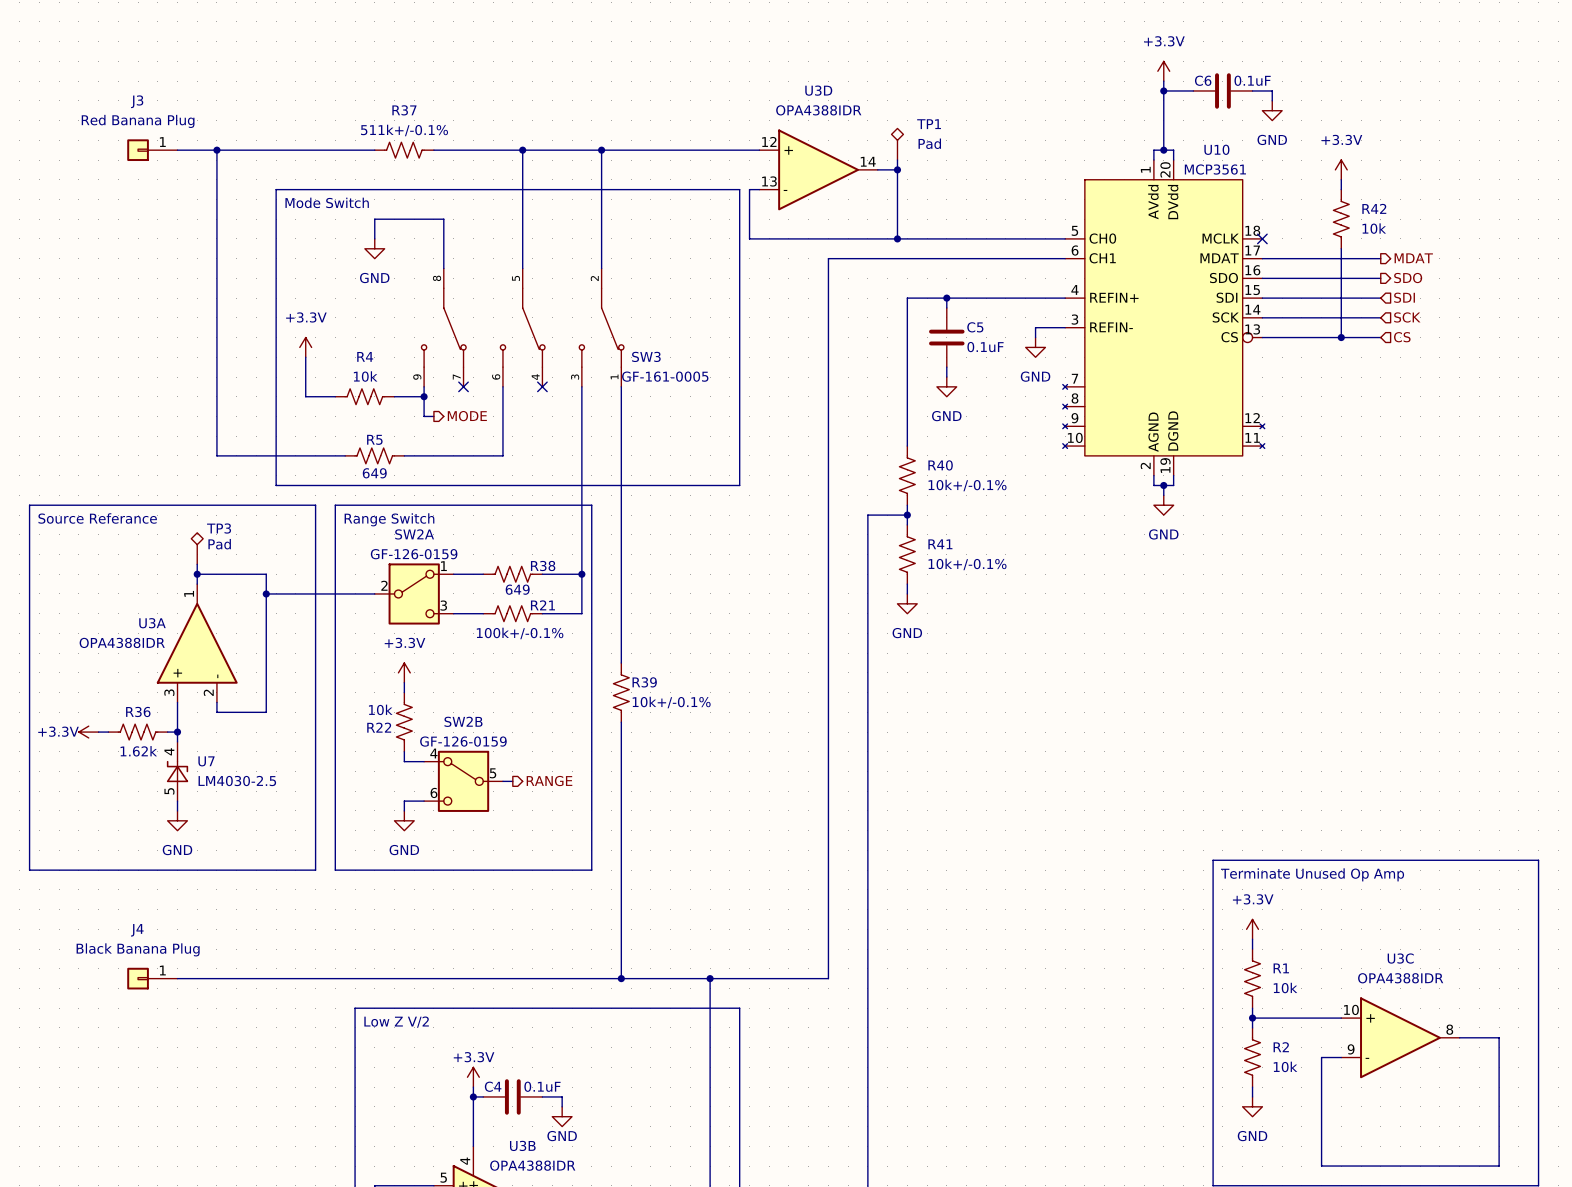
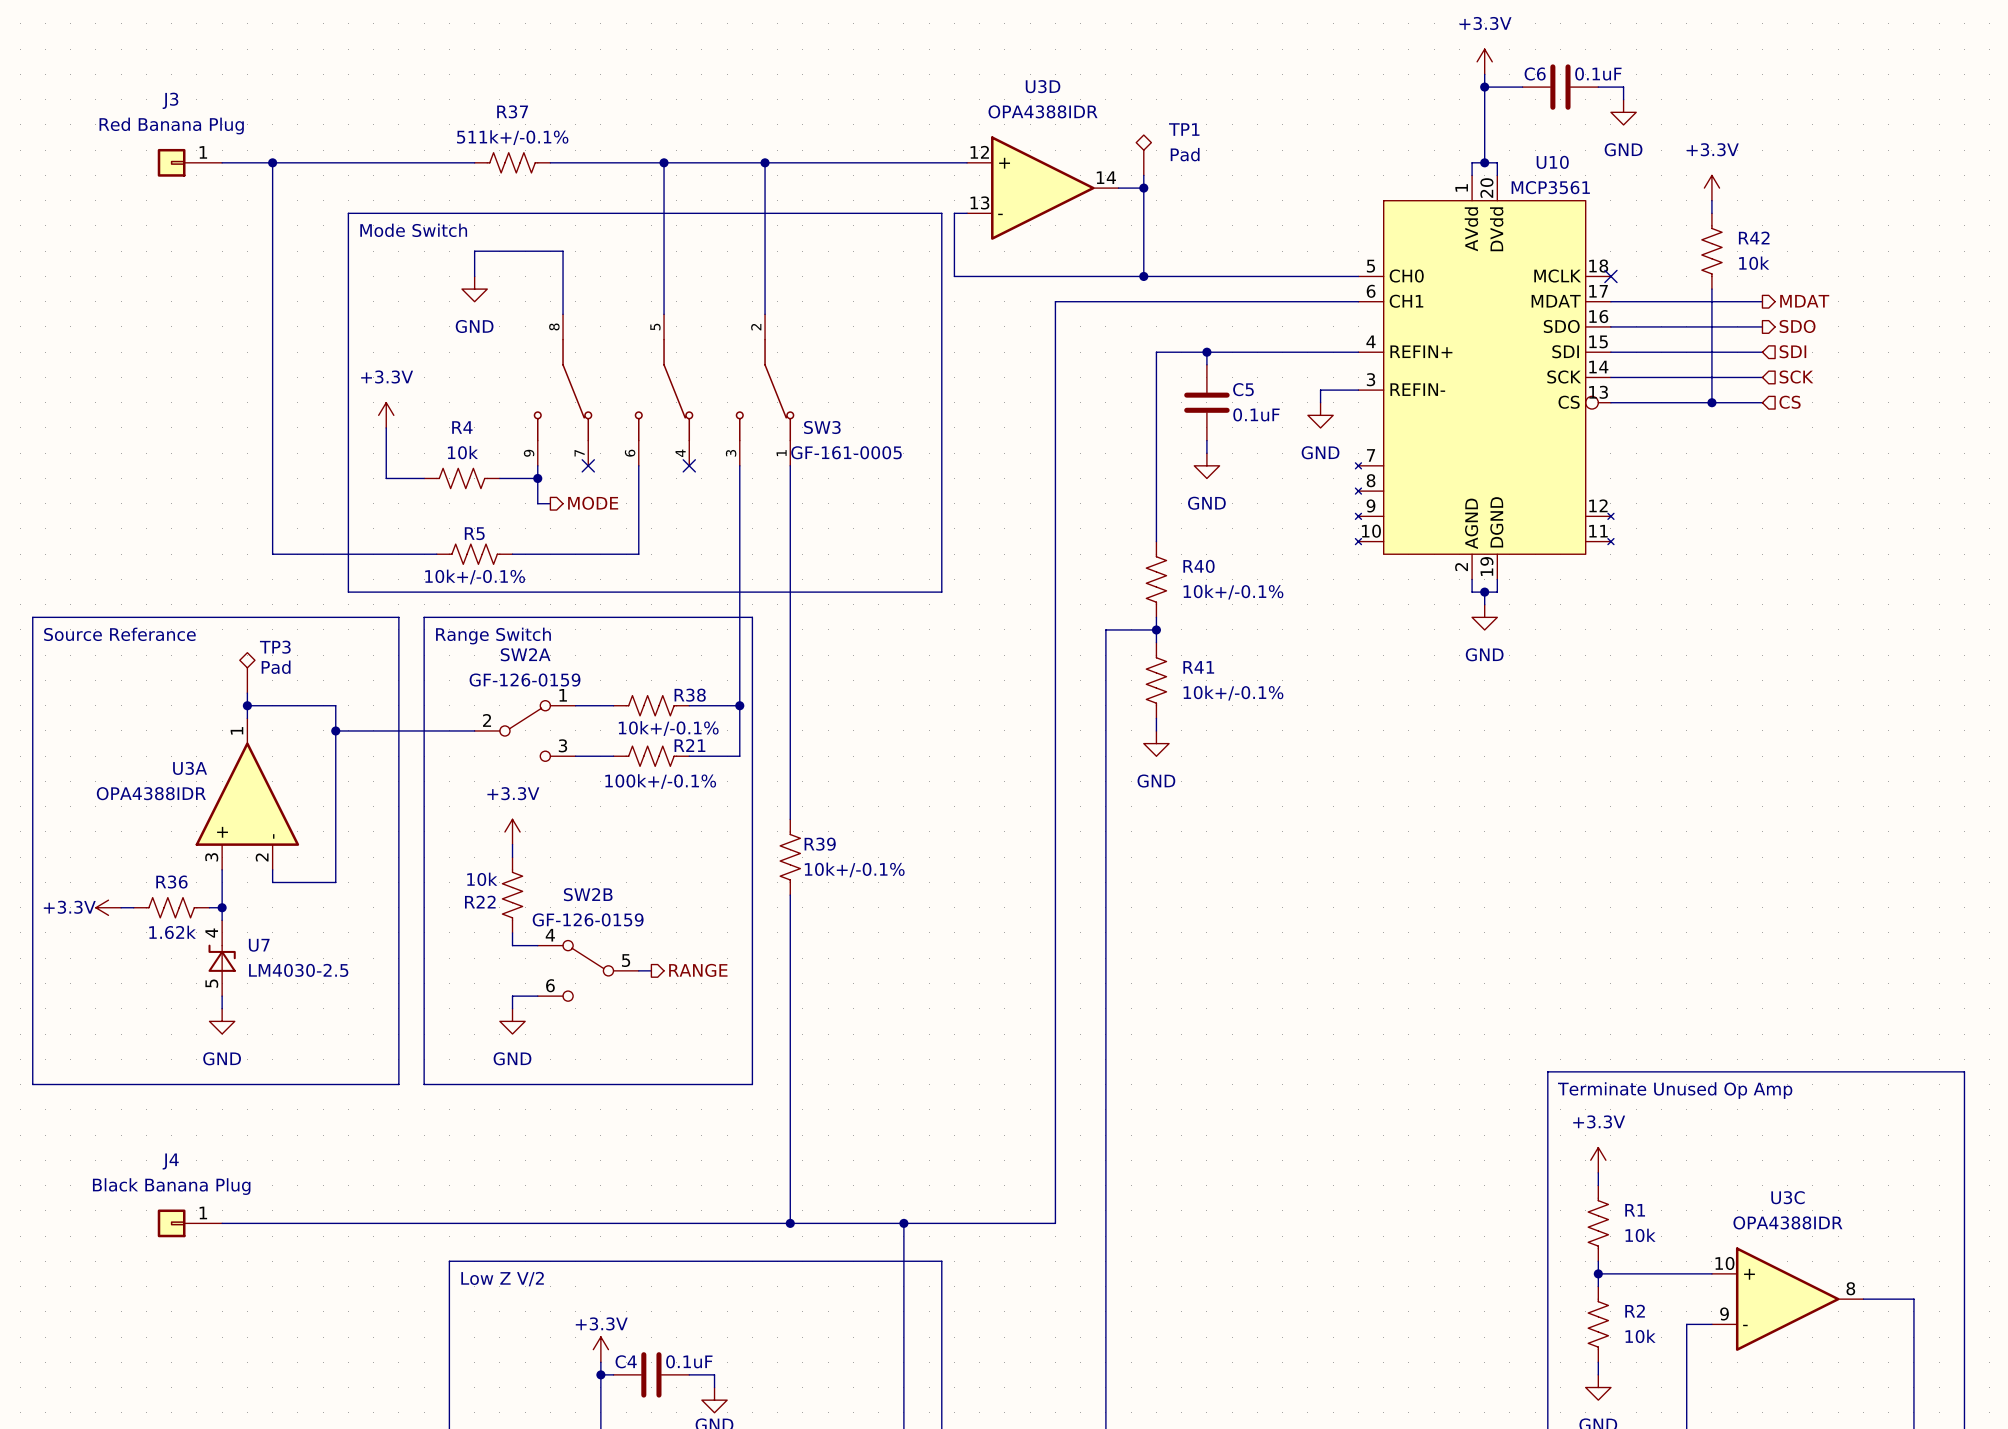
R5 value: 649 (374, 473) -> 10k+/-0.1% (475, 577)
SW2A symbol: [374, 563, 454, 625] -> [474, 700, 576, 762]
R38 value: 649 (517, 589) -> 10k+/-0.1% (668, 728)
SW2B symbol: [424, 750, 503, 812] -> [537, 940, 639, 1002]

